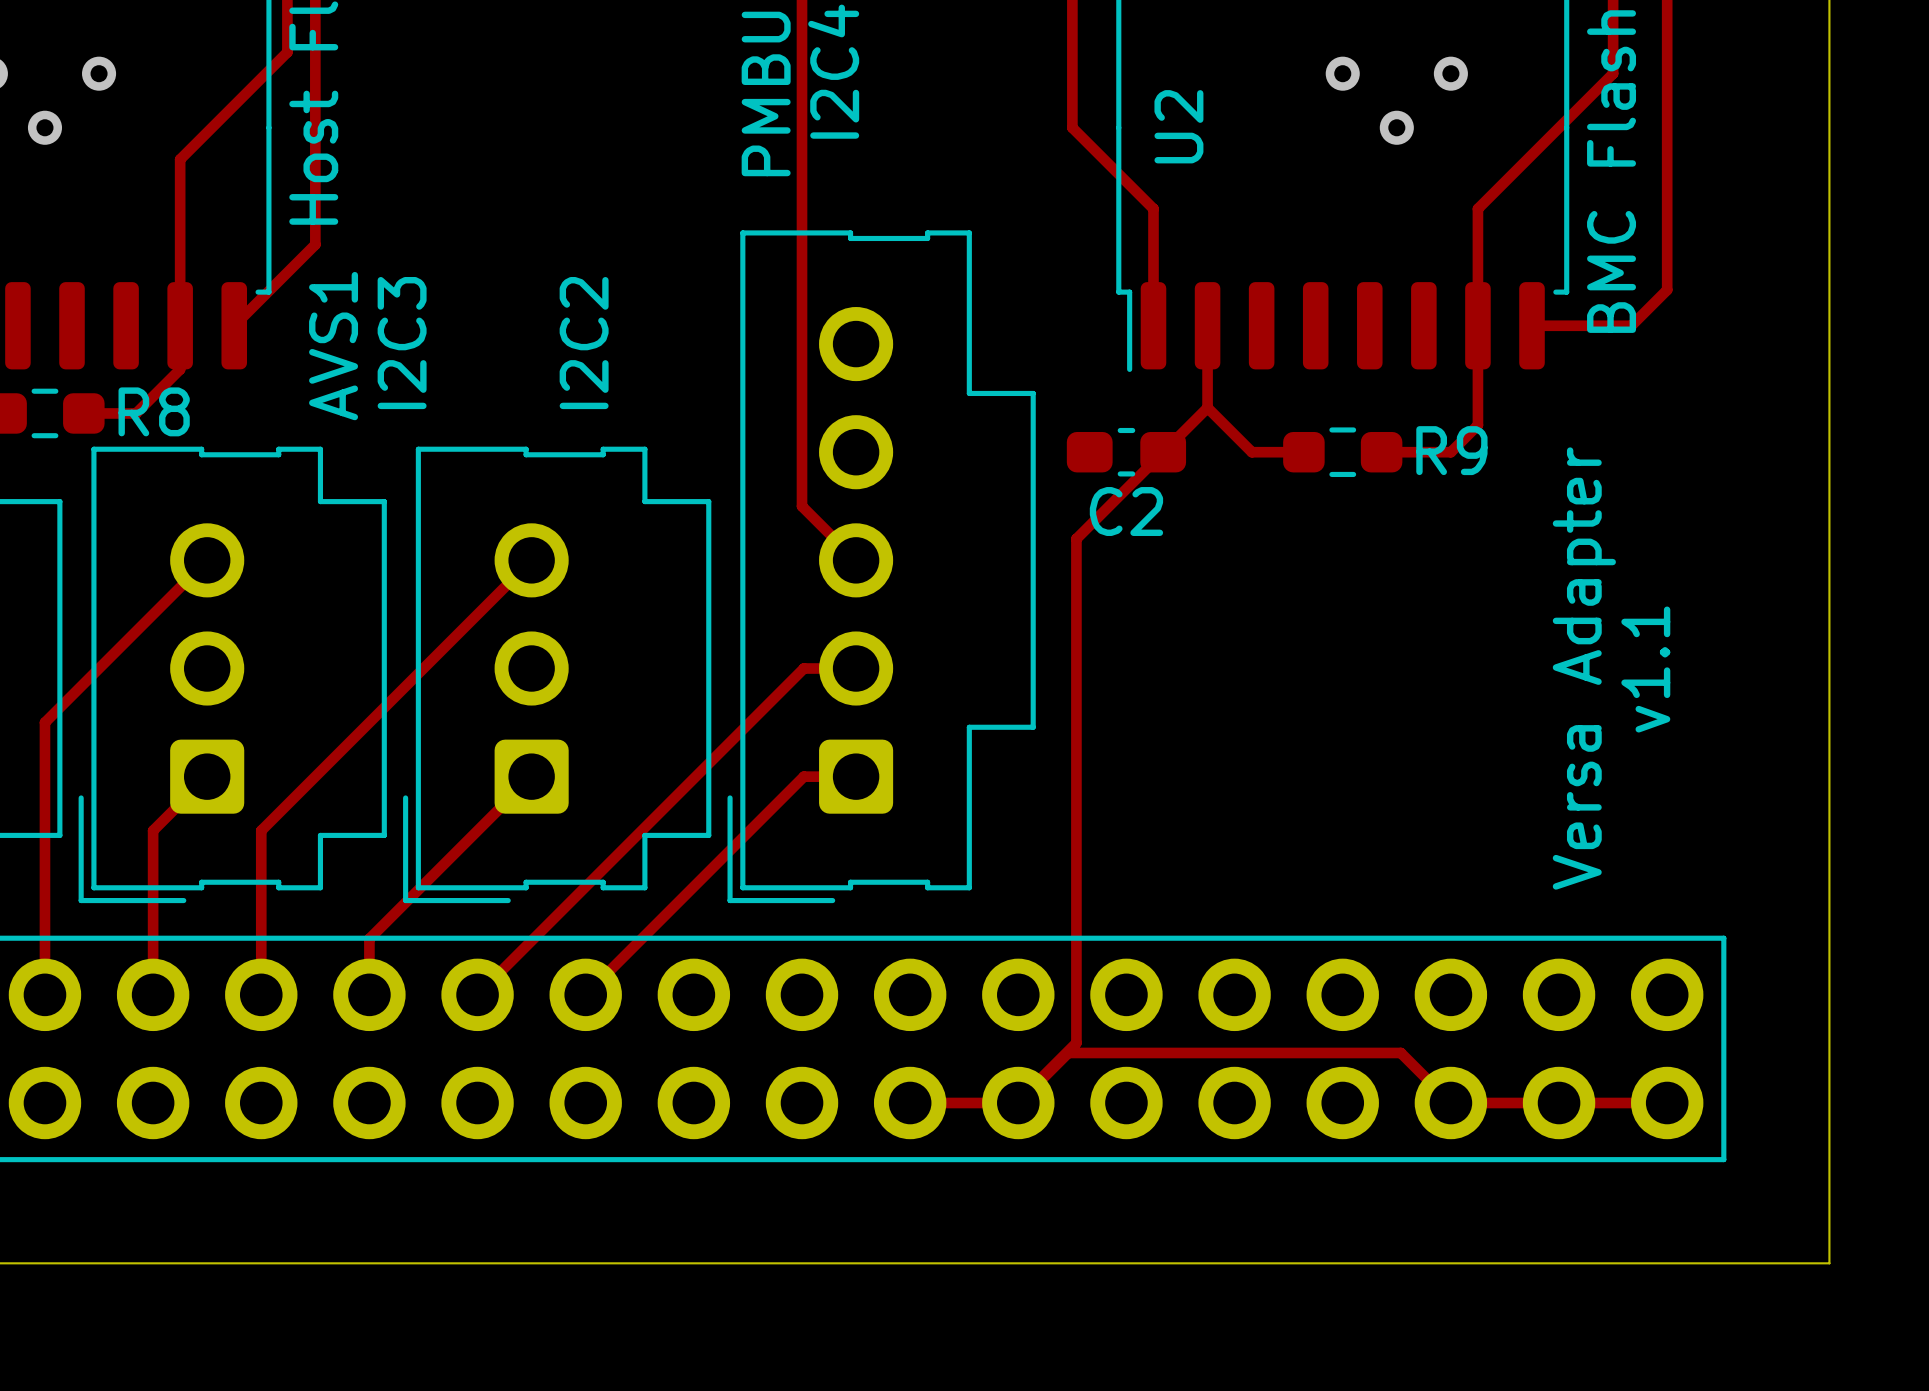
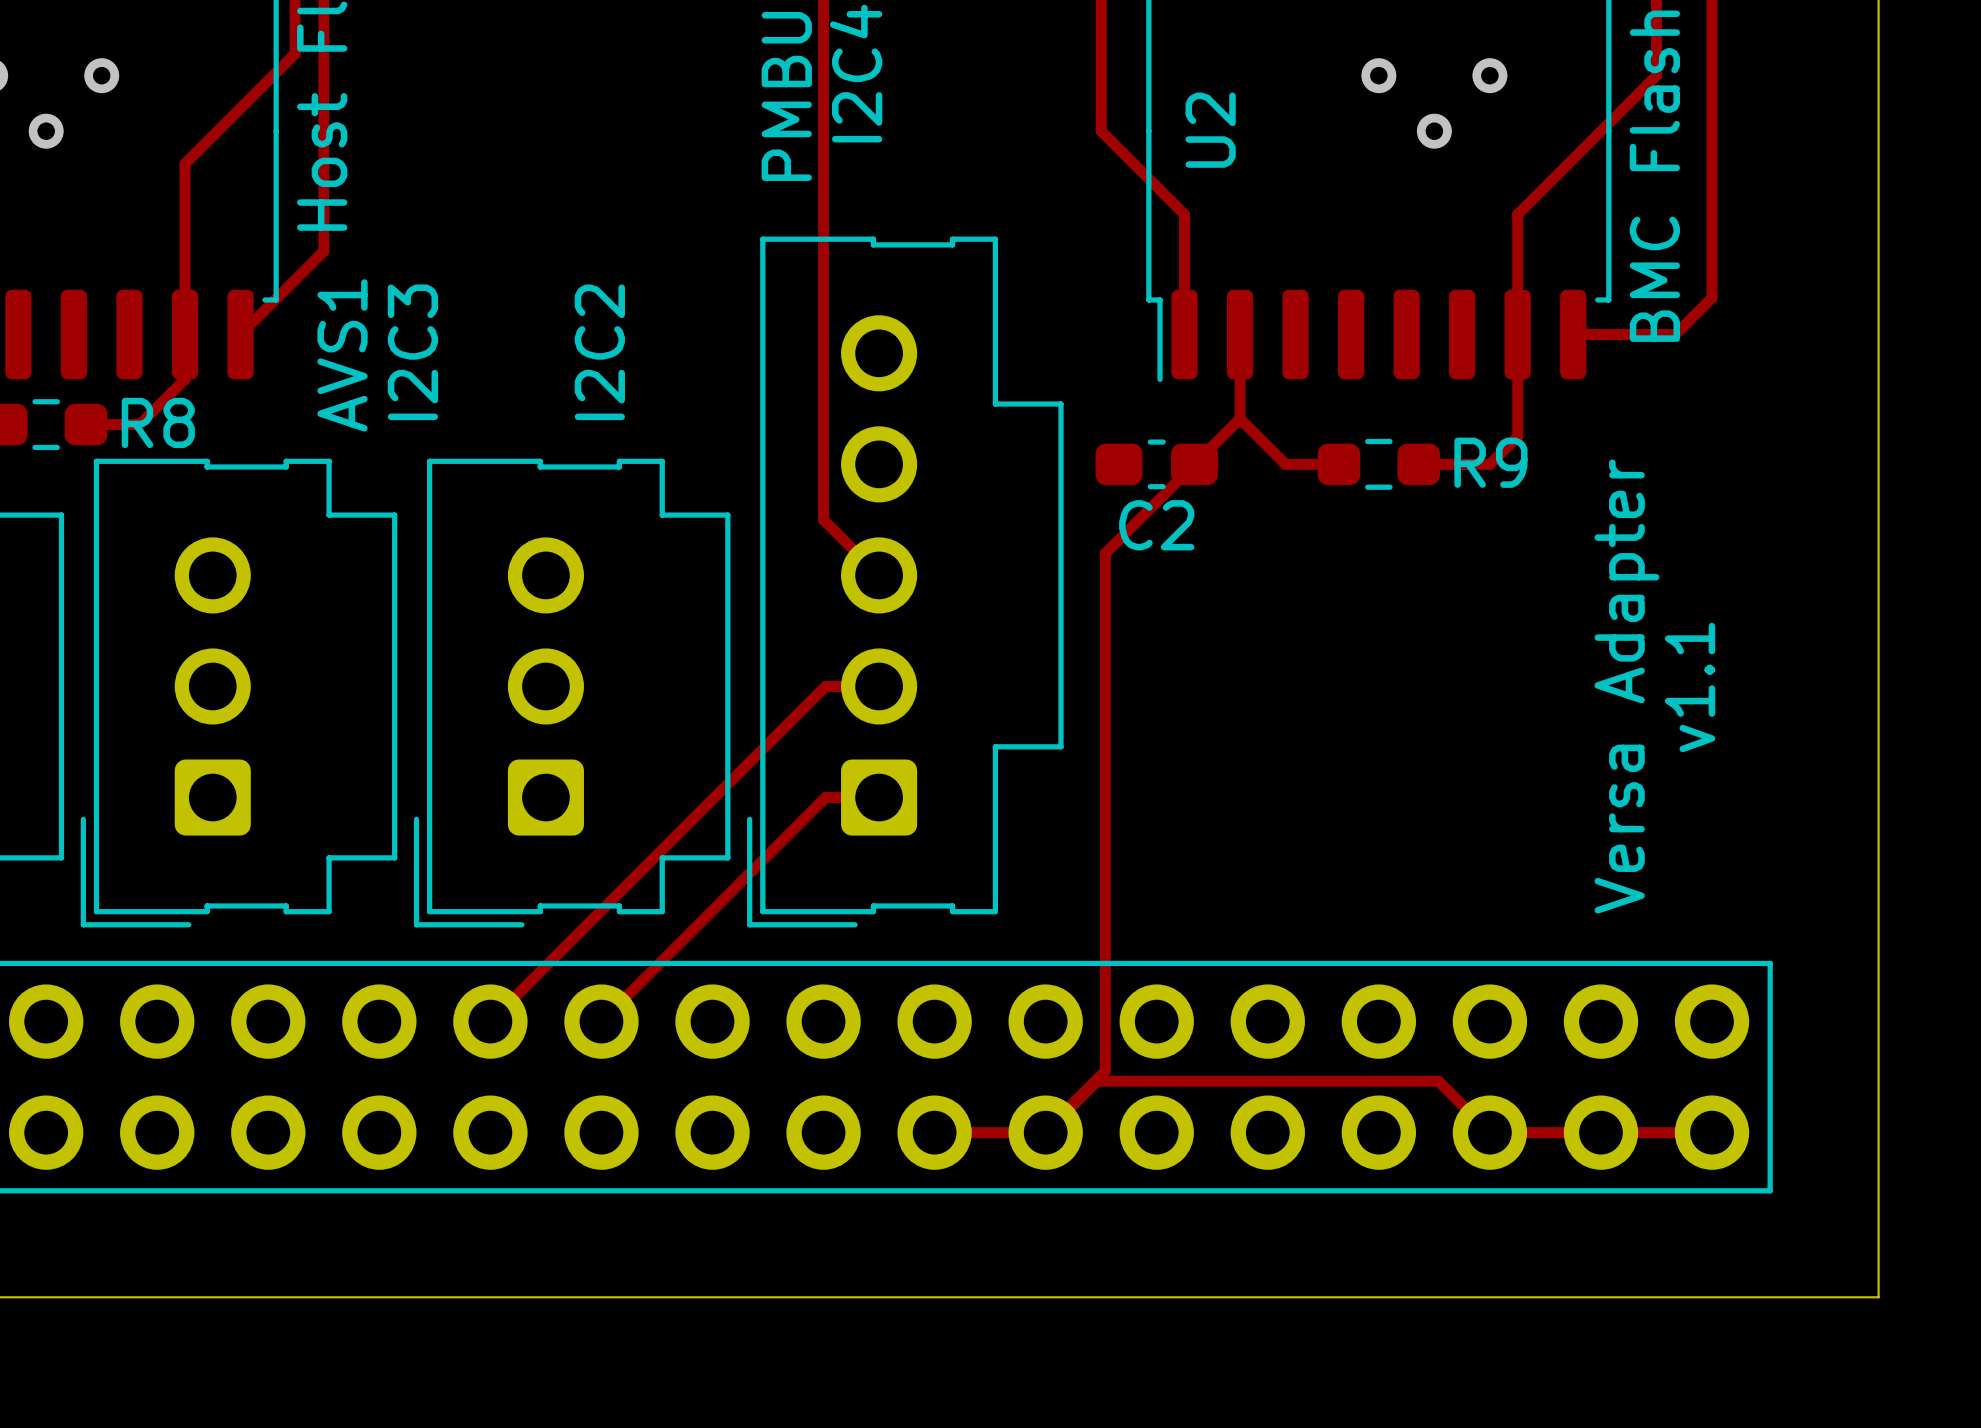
track: (207, 560) (44, 722) (44, 994) -> none
track: (531, 560) (261, 830) (261, 994) -> none
track: (207, 776) (153, 830) (153, 994) -> none
track: (531, 776) (369, 938) (369, 994) -> none

